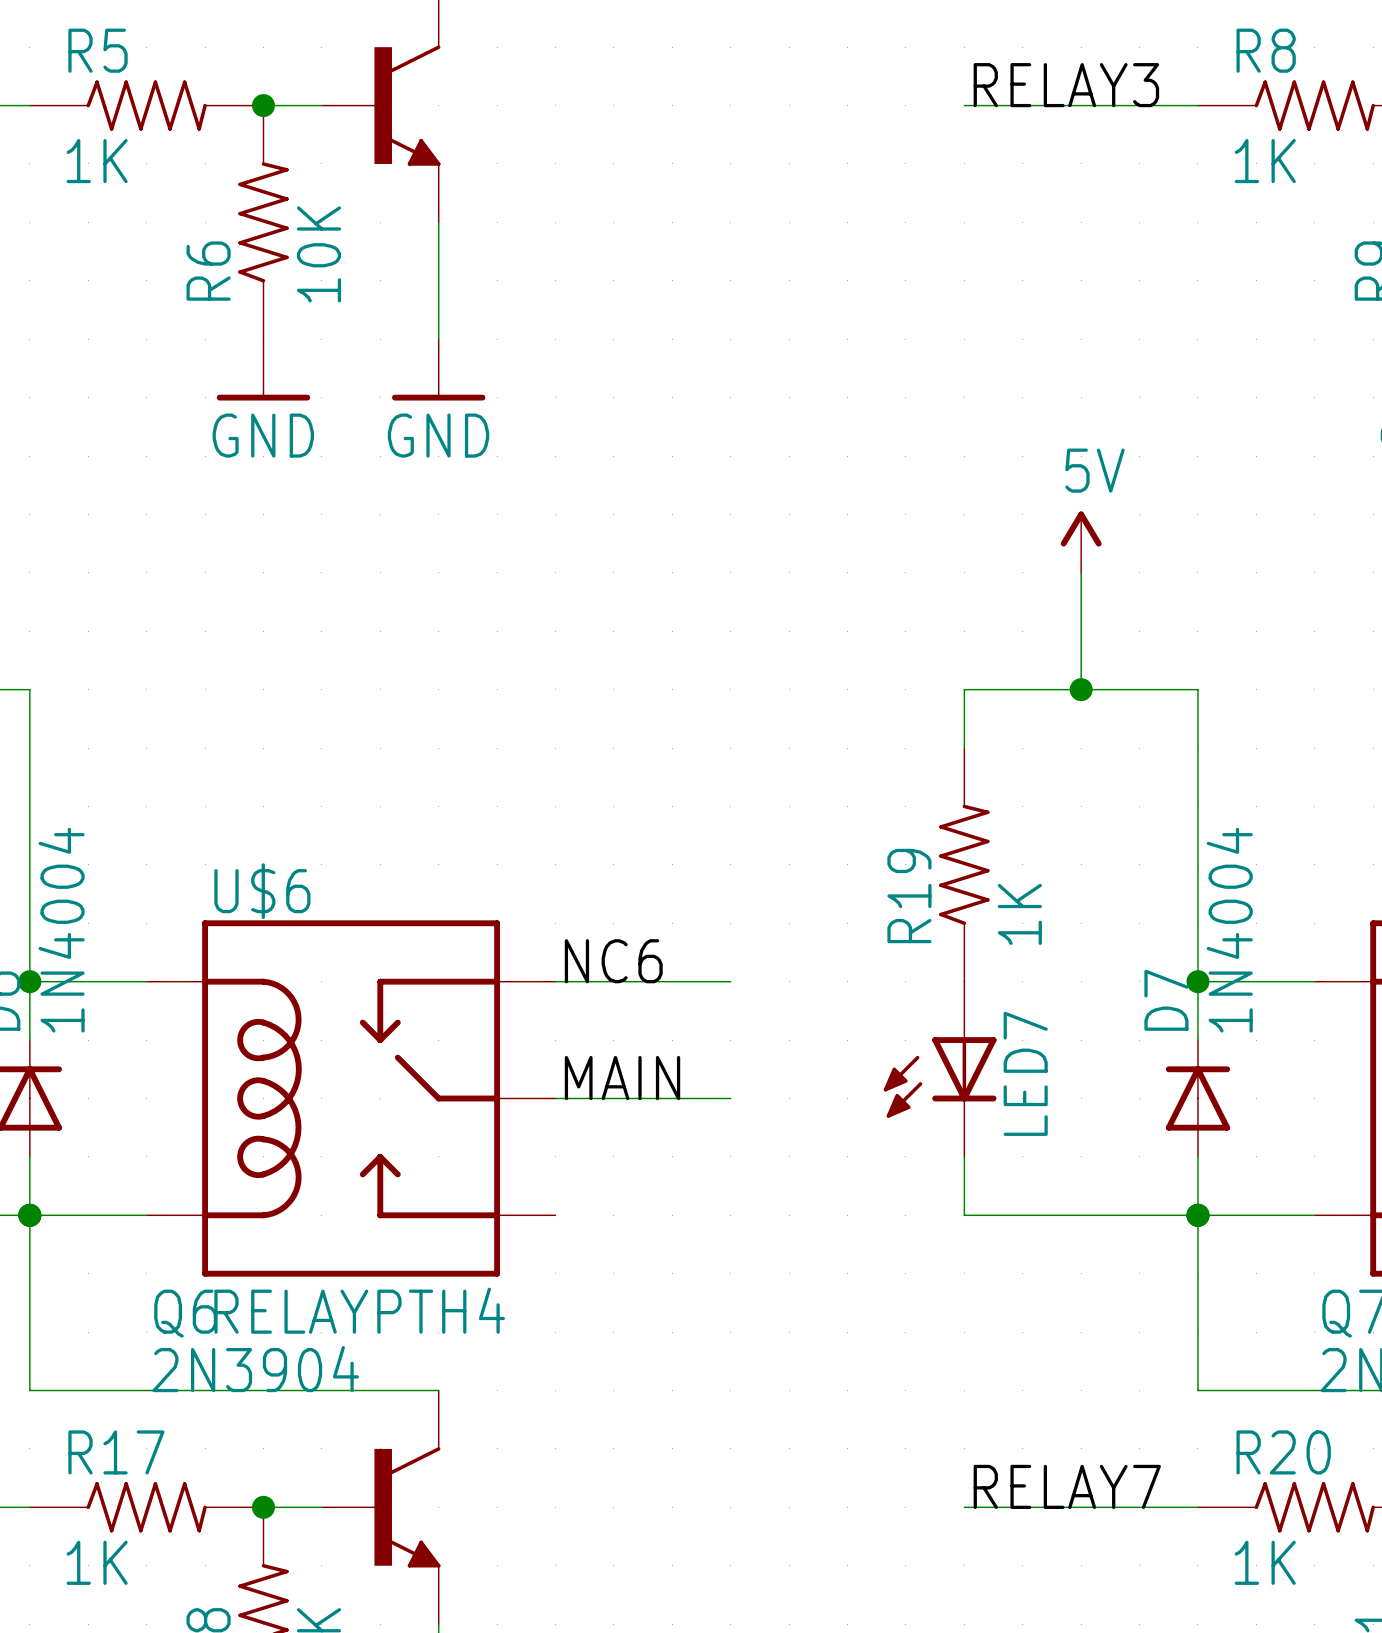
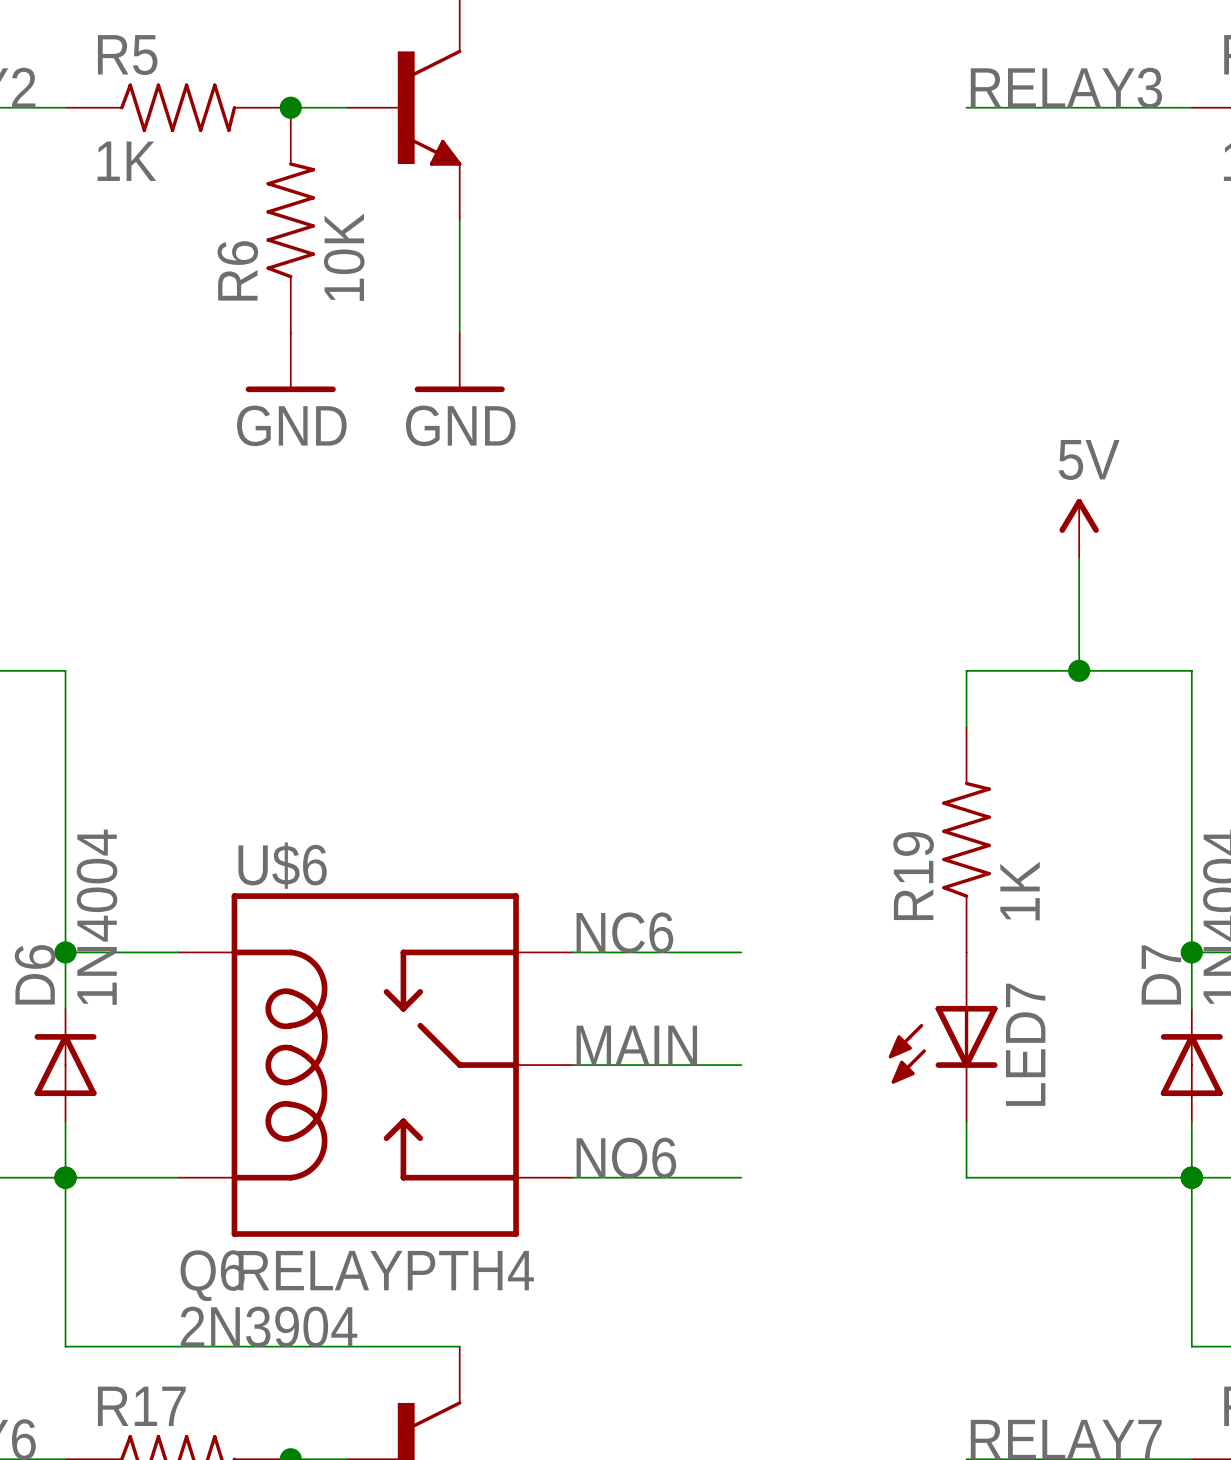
label: none -> NO6 (626, 1157)
wire: none -> (572, 1177) (741, 1177)

